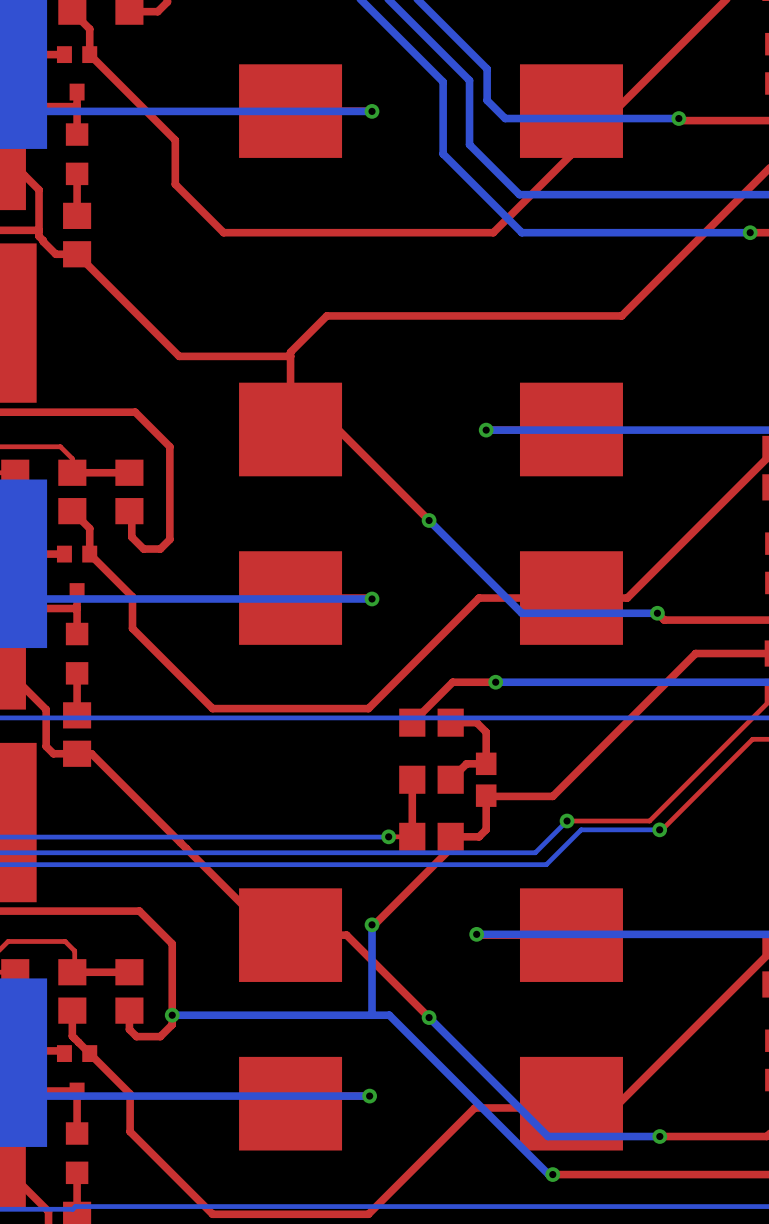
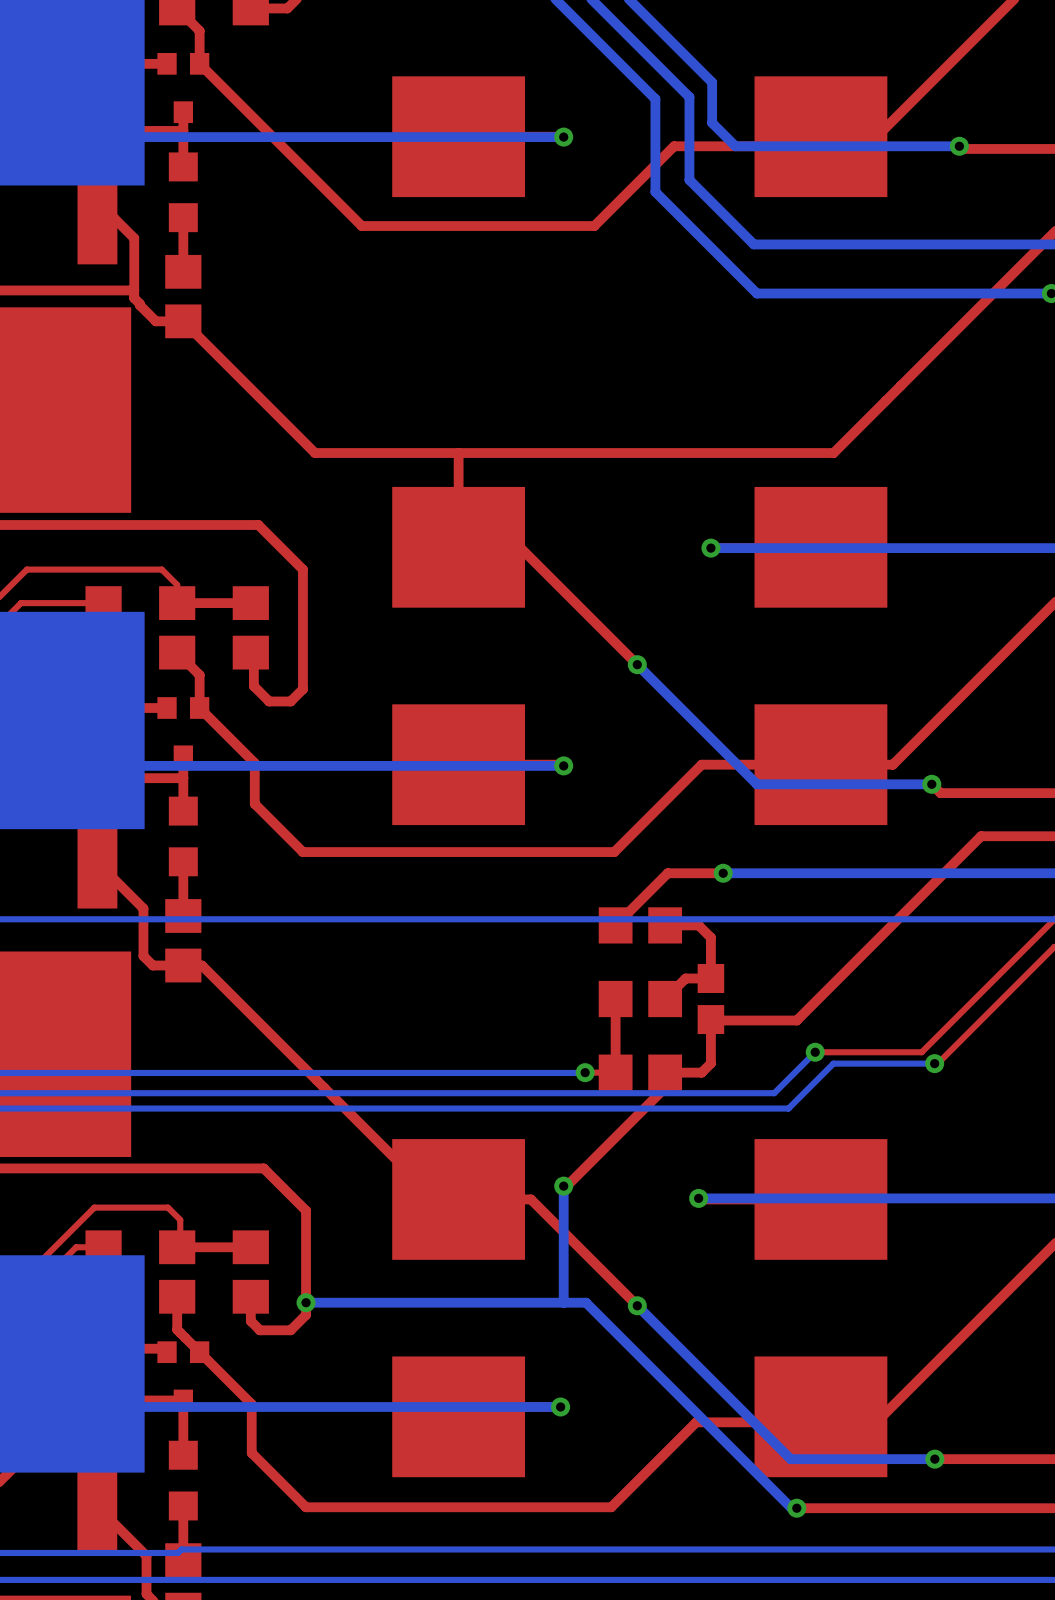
top track: (571, 118) (571, 154) (493, 232) (223, 232) (175, 184) (175, 140) -> (820, 146) (674, 146) (594, 226) (361, 226) (310, 174)
top track: (621, 315) (326, 315) (290, 352) (290, 356) -> (885, 400) (833, 453) (458, 453)
top track: (411, 665) (368, 708) (212, 708) (169, 665) -> (614, 852) (302, 852)
top track: (408, 1173) (368, 1214) (212, 1214) (172, 1173) -> (611, 1507) (306, 1507)

